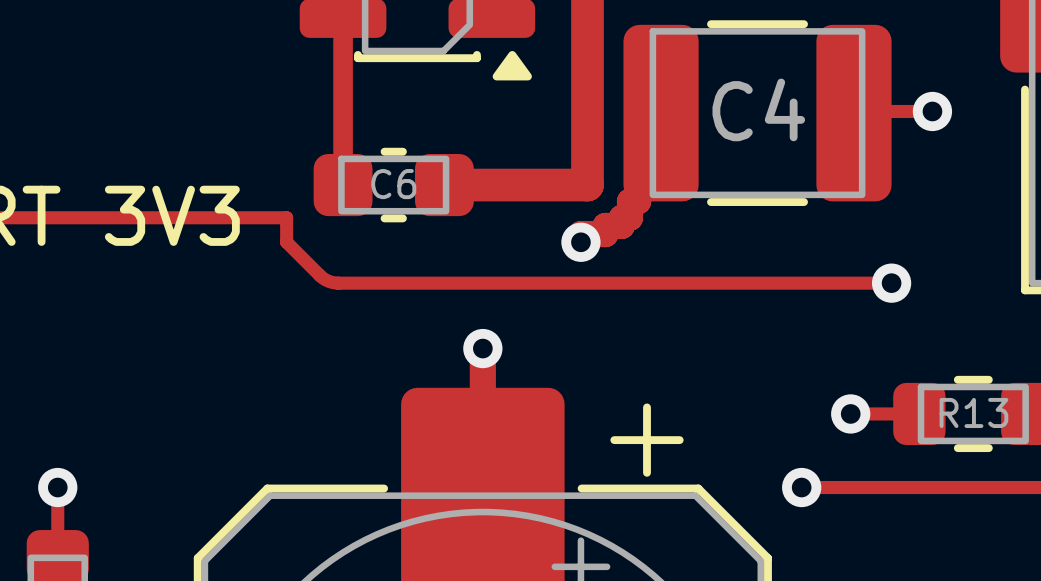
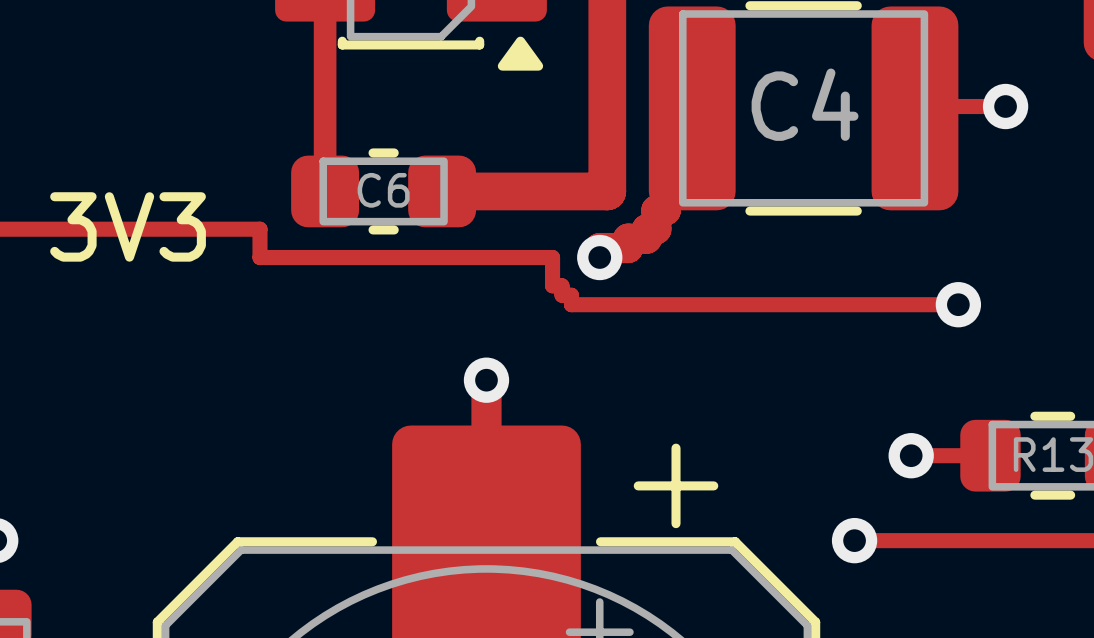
track: (286, 242) (322, 277) (334, 282) (556, 283) -> (259, 257) (552, 257) (552, 285) (561, 285) (561, 295) (571, 295) (571, 304)

